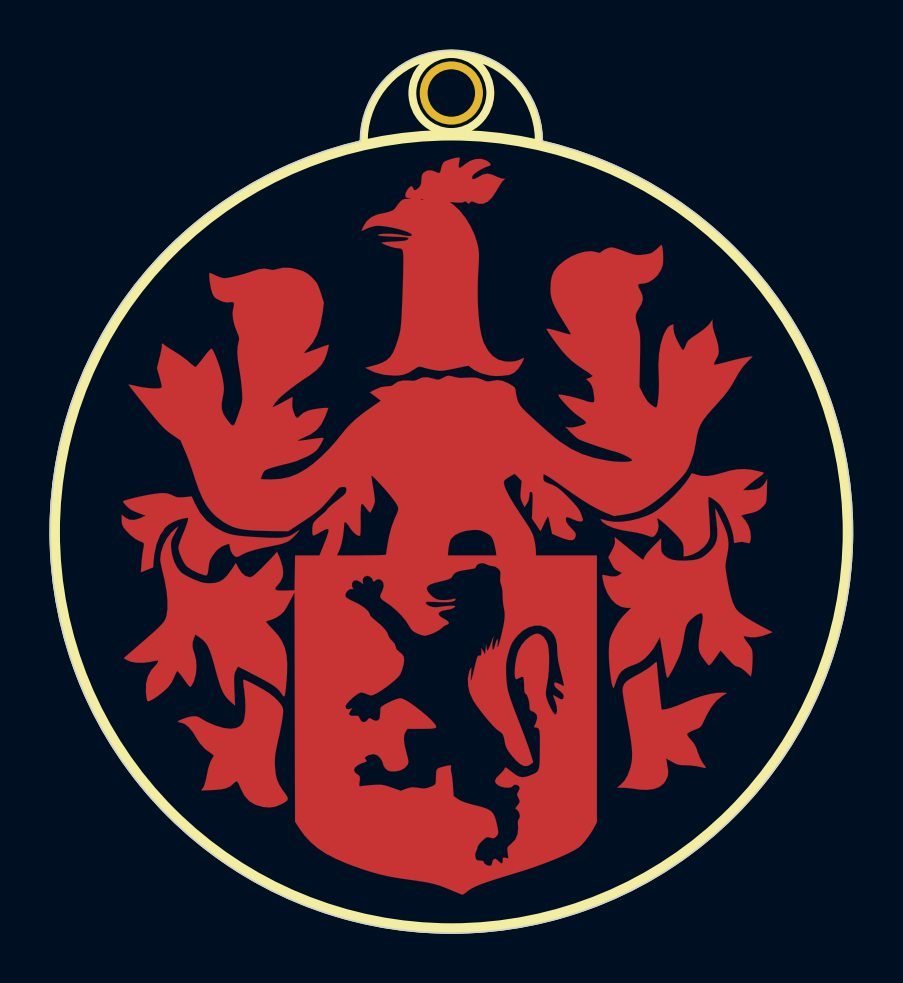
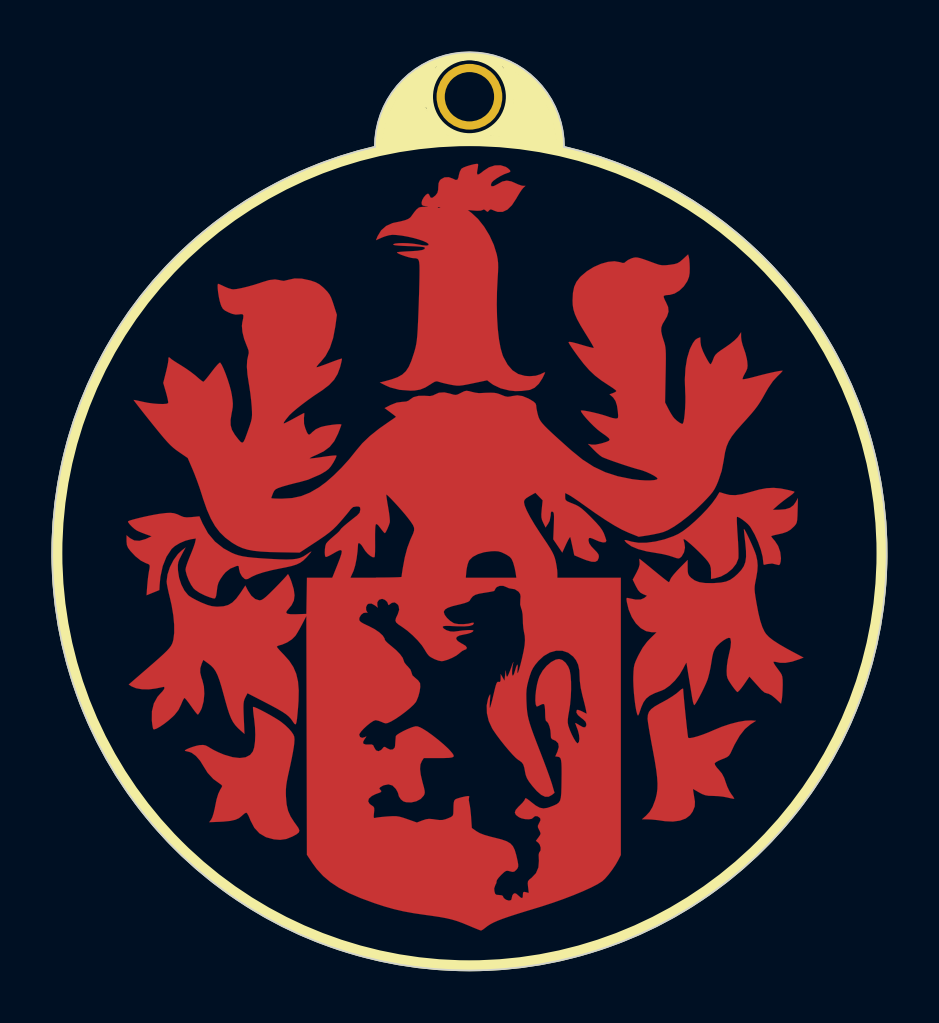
drawing: none -> [379, 62, 454, 148]
drawing: none -> [490, 62, 560, 148]

